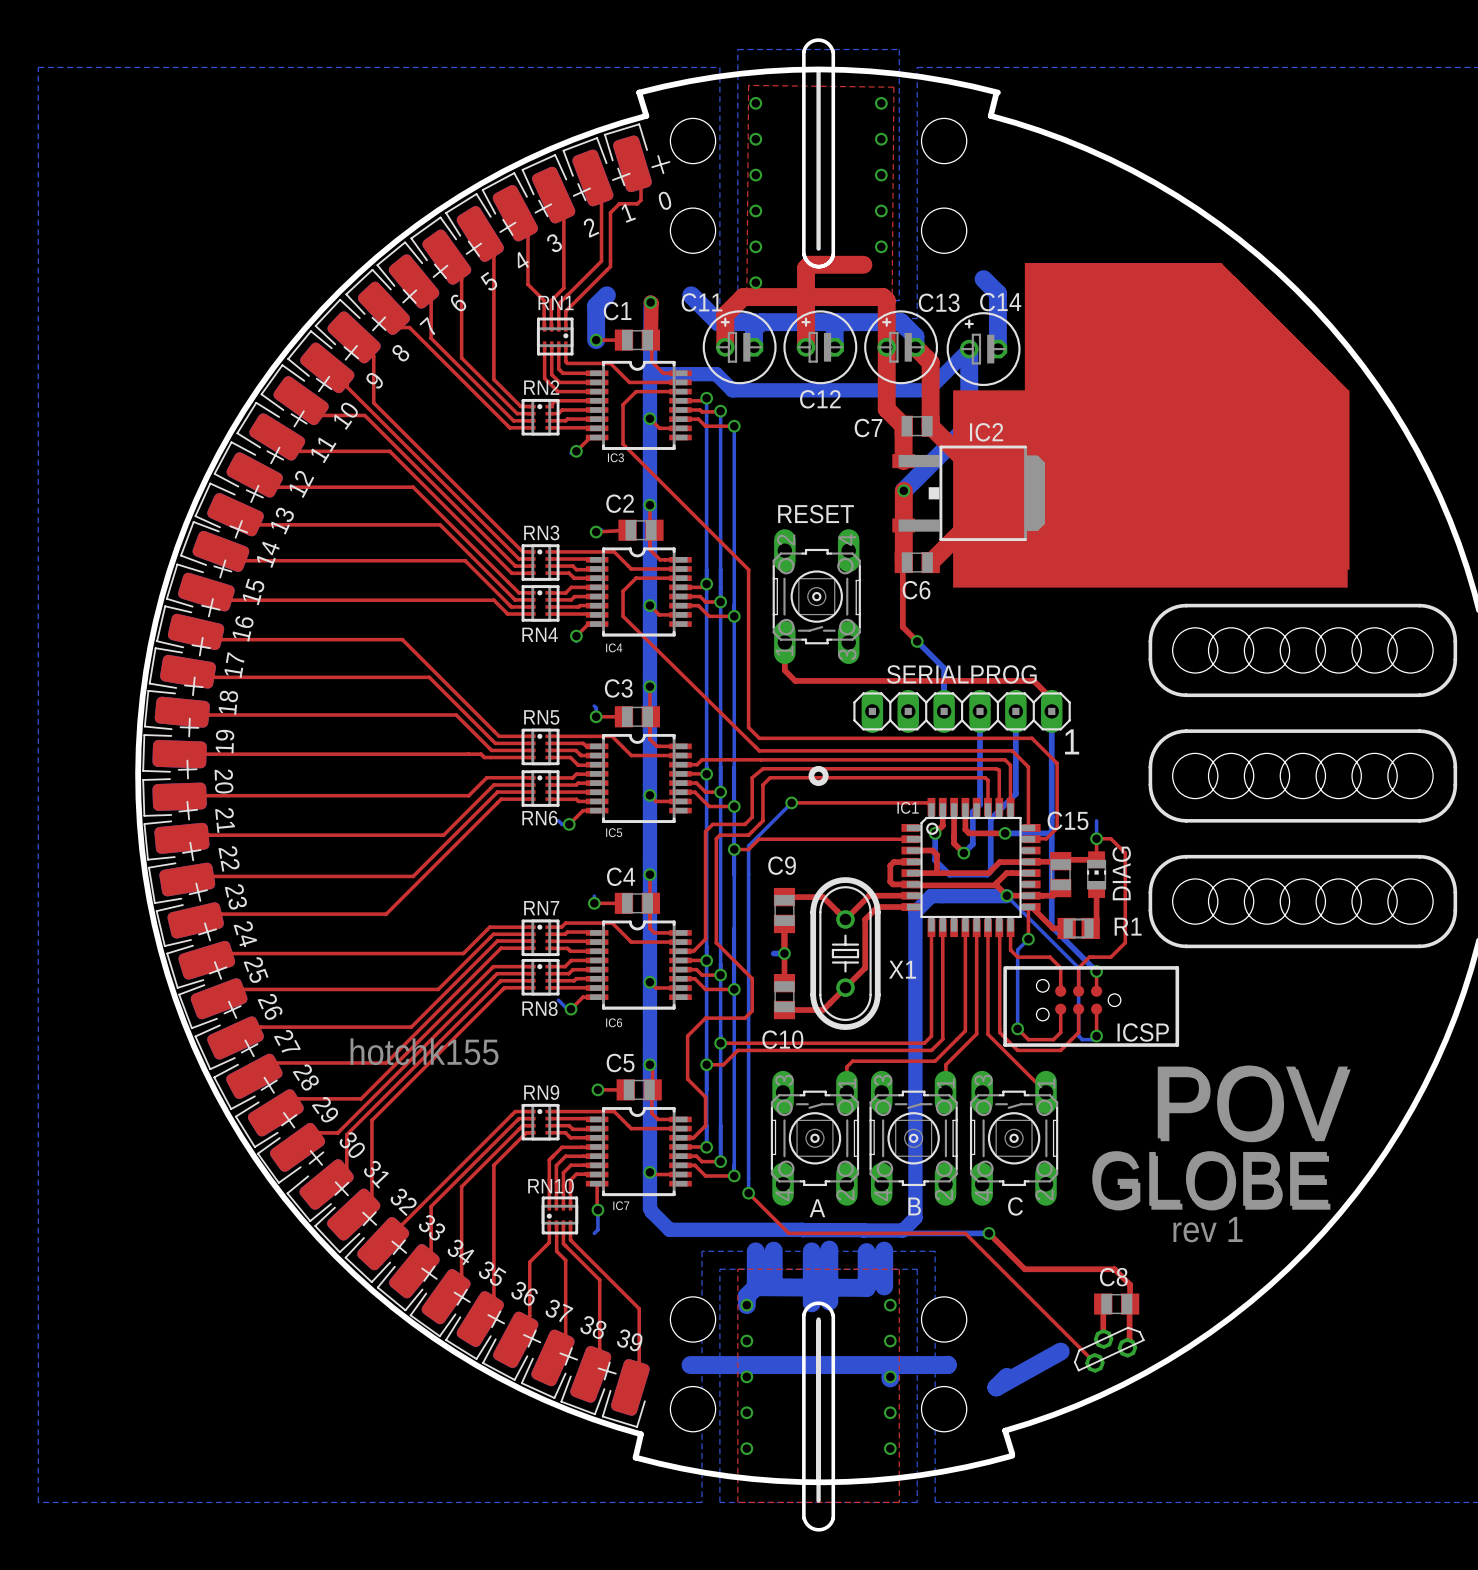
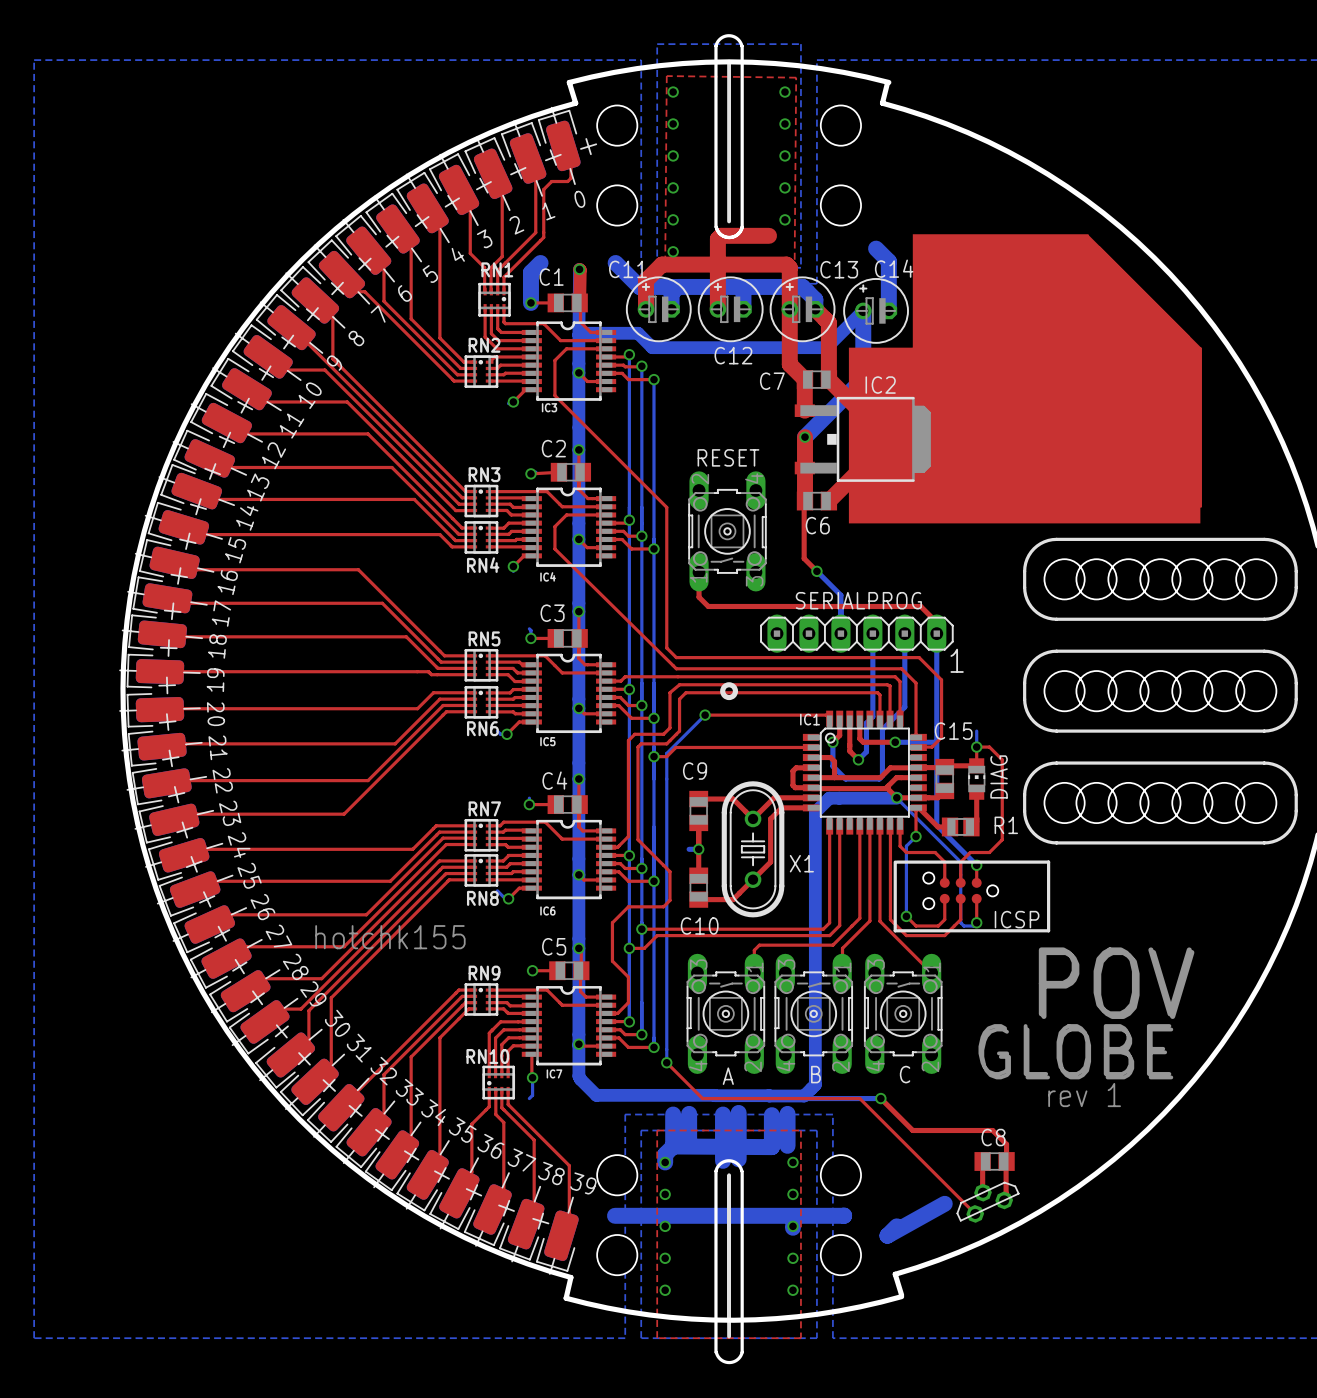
0 footprint: [604, 123, 671, 193] -> [537, 106, 598, 185]
1 footprint: [562, 137, 631, 207] -> [501, 120, 562, 197]
2 footprint: [521, 154, 591, 224] -> [464, 136, 527, 211]
3 footprint: [481, 172, 553, 242] -> [429, 153, 492, 226]
4 footprint: [445, 193, 517, 262] -> [396, 172, 460, 244]
5 footprint: [410, 216, 483, 285] -> [365, 192, 430, 263]
6 footprint: [376, 241, 449, 309] -> [335, 215, 400, 283]
7 footprint: [345, 268, 418, 335] -> [307, 239, 372, 305]
8 footprint: [314, 298, 387, 364] -> [280, 266, 346, 329]
9 footprint: [287, 330, 360, 394] -> [255, 294, 324, 354]
10 footprint: [260, 364, 333, 426] -> [232, 324, 302, 381]
11 footprint: [236, 401, 308, 461] -> [210, 357, 282, 412]
12 footprint: [213, 441, 285, 498] -> [190, 393, 263, 444]
13 footprint: [194, 482, 264, 537] -> [172, 429, 247, 478]
14 footprint: [180, 520, 250, 572] -> [158, 463, 235, 510]
15 footprint: [165, 559, 235, 612] -> [144, 498, 223, 545]
16 footprint: [156, 598, 225, 651] -> [134, 532, 215, 579]
17 footprint: [148, 636, 216, 689] -> [127, 567, 208, 614]
18 footprint: [143, 676, 210, 731] -> [121, 602, 203, 651]
19 footprint: [142, 717, 207, 773] -> [119, 639, 201, 689]
20 footprint: [142, 759, 207, 817] -> [119, 676, 201, 728]
21 footprint: [143, 800, 210, 861] -> [121, 713, 203, 767]
22 footprint: [148, 841, 216, 904] -> [126, 749, 208, 806]
23 footprint: [155, 882, 224, 947] -> [134, 786, 215, 844]
24 footprint: [166, 922, 236, 989] -> [145, 821, 224, 881]
25 footprint: [178, 961, 248, 1030] -> [156, 856, 234, 917]
26 footprint: [194, 1000, 264, 1071] -> [172, 891, 247, 954]
27 footprint: [213, 1039, 283, 1110] -> [190, 925, 263, 989]
28 footprint: [235, 1076, 304, 1148] -> [209, 959, 281, 1023]
29 footprint: [257, 1112, 326, 1184] -> [228, 990, 299, 1055]
30 footprint: [286, 1150, 354, 1223] -> [255, 1024, 323, 1089]
31 footprint: [314, 1181, 381, 1254] -> [280, 1052, 346, 1117]
32 footprint: [344, 1211, 410, 1284] -> [307, 1077, 370, 1143]
33 footprint: [376, 1239, 440, 1312] -> [335, 1100, 396, 1168]
34 footprint: [409, 1265, 471, 1338] -> [364, 1121, 422, 1191]
35 footprint: [445, 1288, 504, 1360] -> [396, 1140, 450, 1212]
36 footprint: [482, 1310, 539, 1381] -> [429, 1157, 480, 1230]
37 footprint: [520, 1329, 575, 1399] -> [463, 1172, 512, 1247]
38 footprint: [559, 1346, 612, 1416] -> [498, 1185, 545, 1263]
39 footprint: [597, 1359, 650, 1428] -> [532, 1196, 579, 1275]

